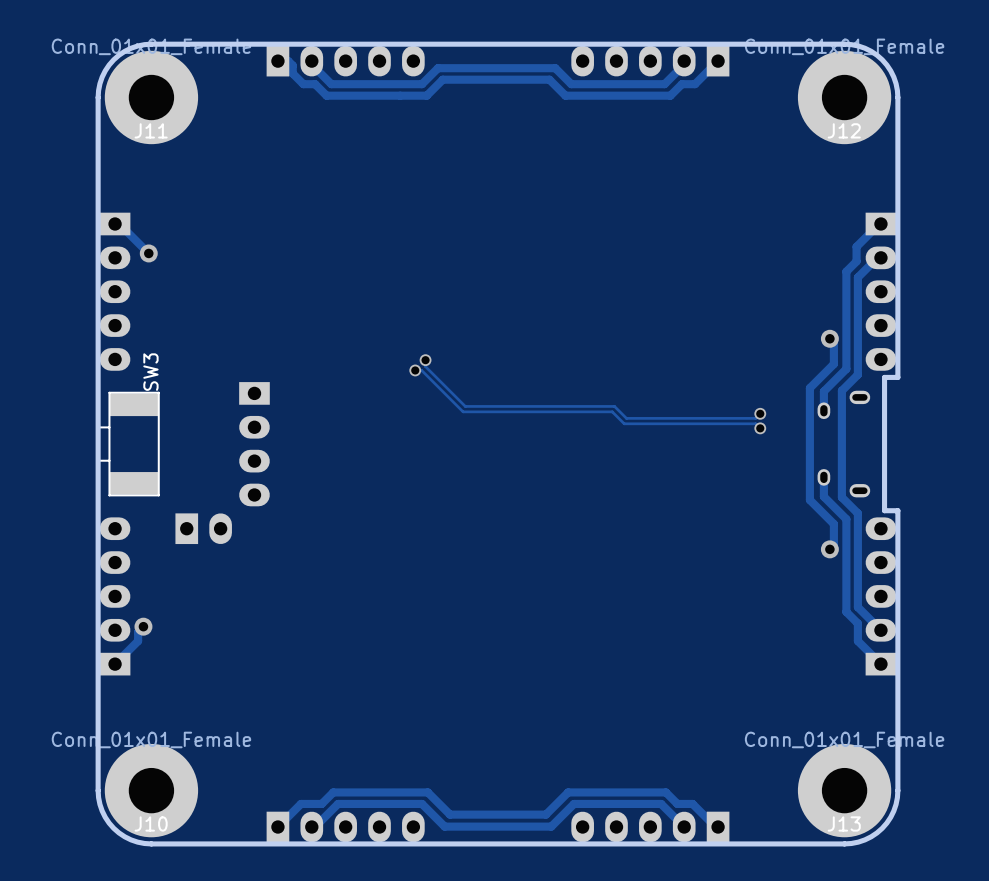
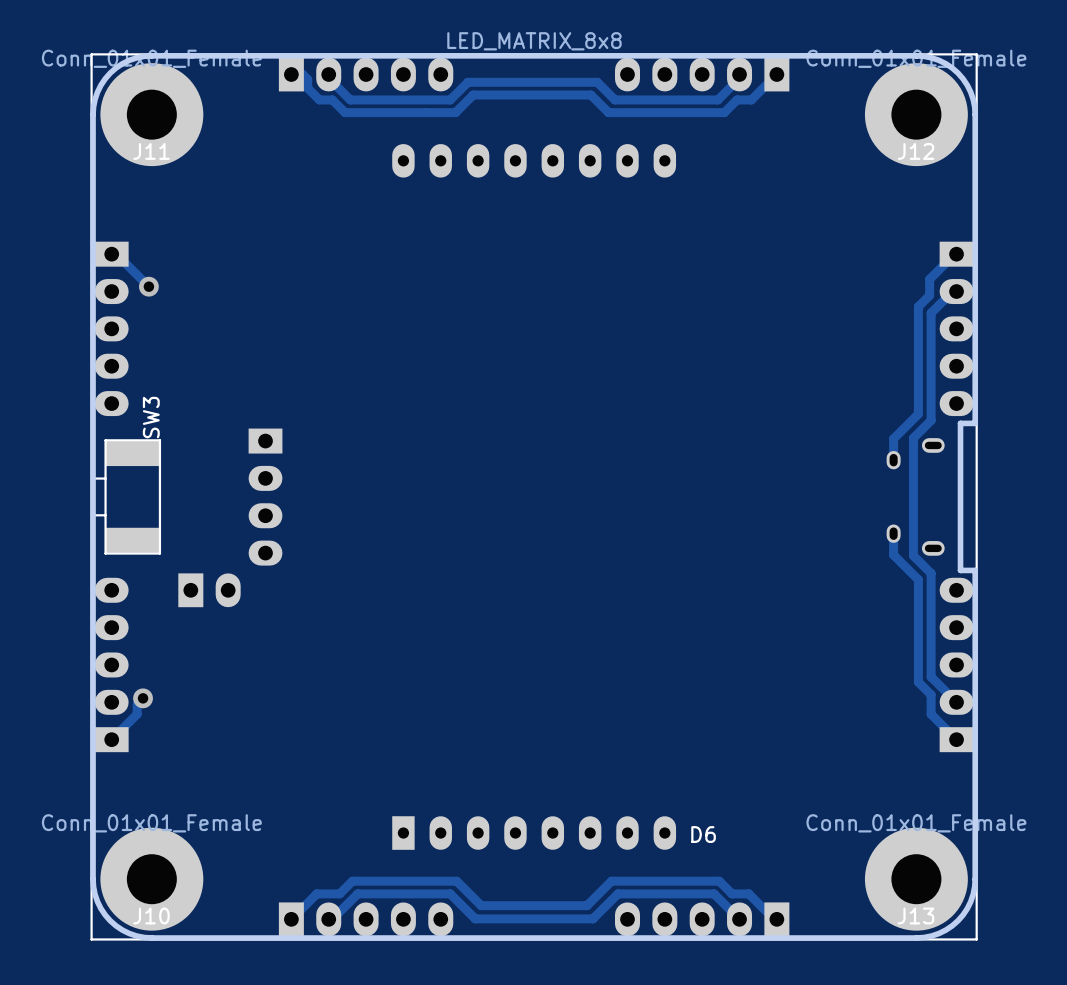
track: (829, 338) (833, 342) (833, 364) (809, 388) (809, 500) (833, 524) (833, 545) (829, 549) -> none
via: (829, 338) -> none
track: (425, 360) (425, 366) (465, 406) (614, 406) (626, 418) (755, 418) (760, 413) -> none
via: (425, 360) -> none
track: (415, 370) (421, 370) (463, 411) (612, 411) (624, 423) (755, 423) (760, 428) -> none
via: (415, 370) -> none
via: (760, 413) -> none
via: (760, 428) -> none
D6: none -> LED_MATRIX_8x8 (534, 496)
via: (829, 549) -> none

